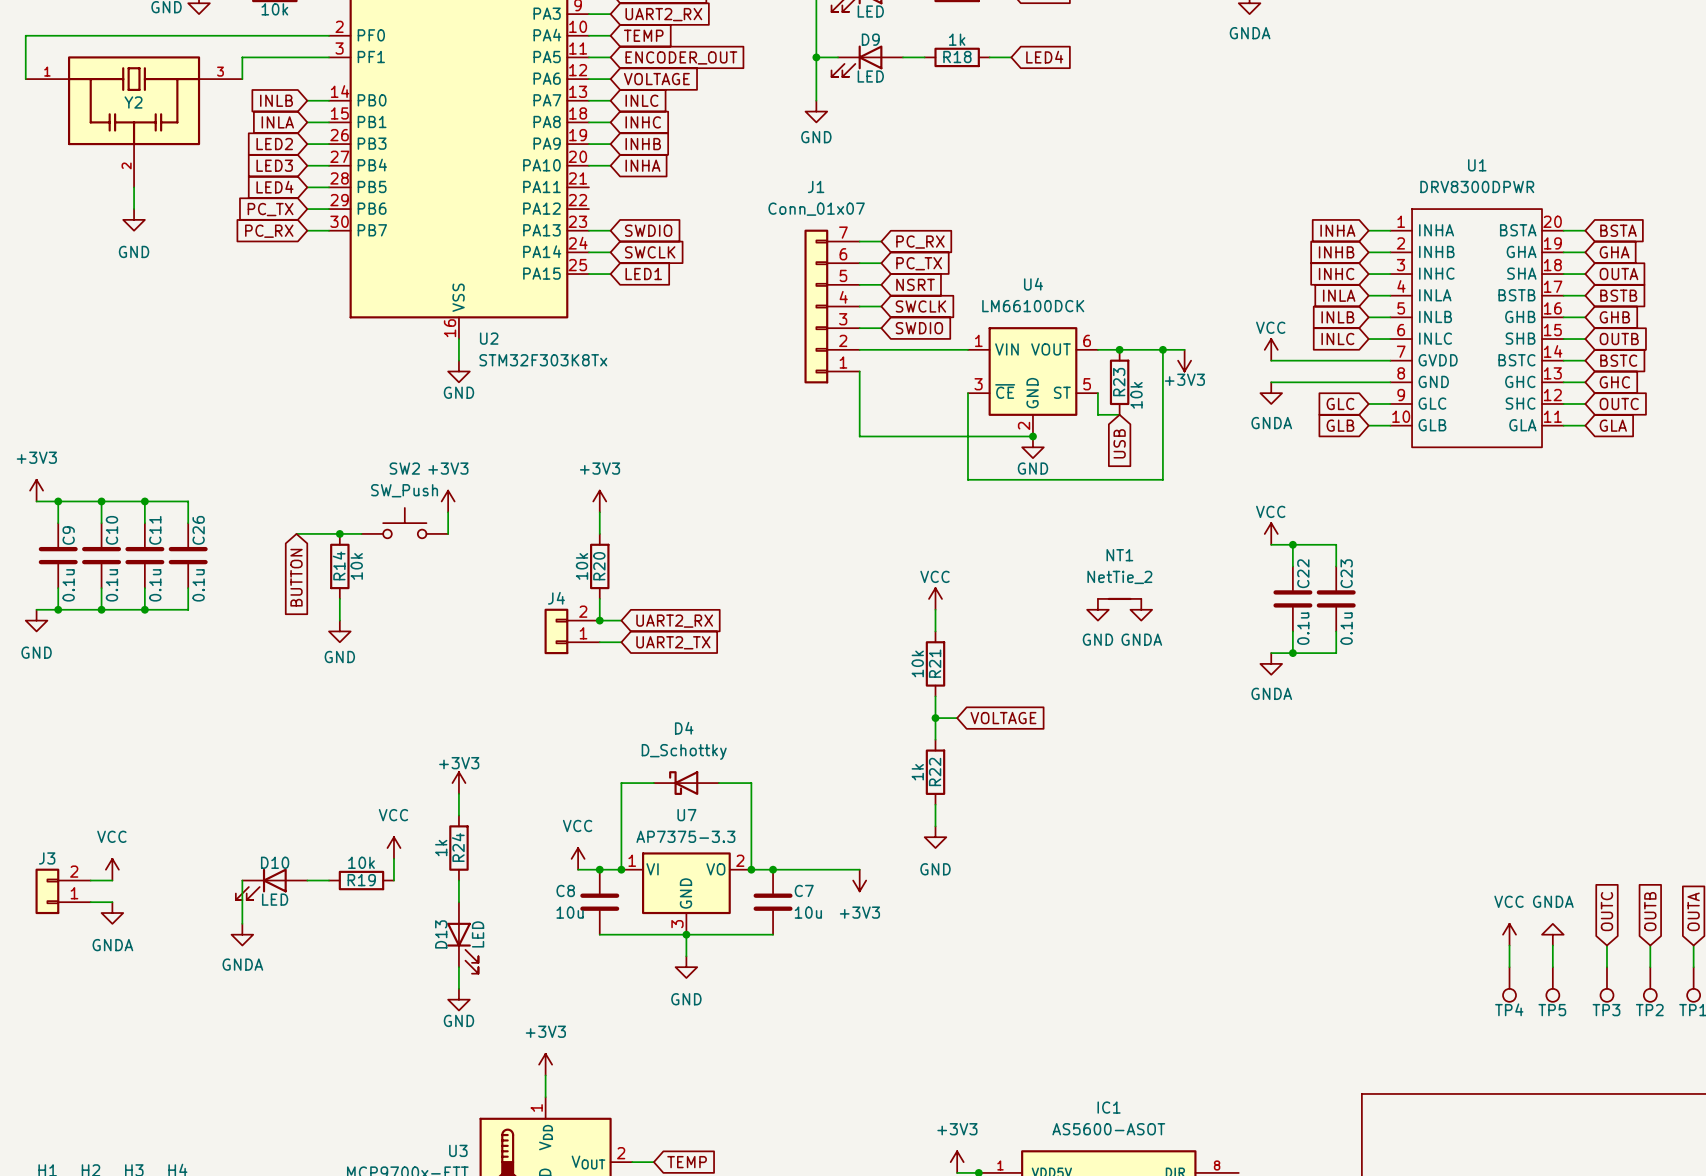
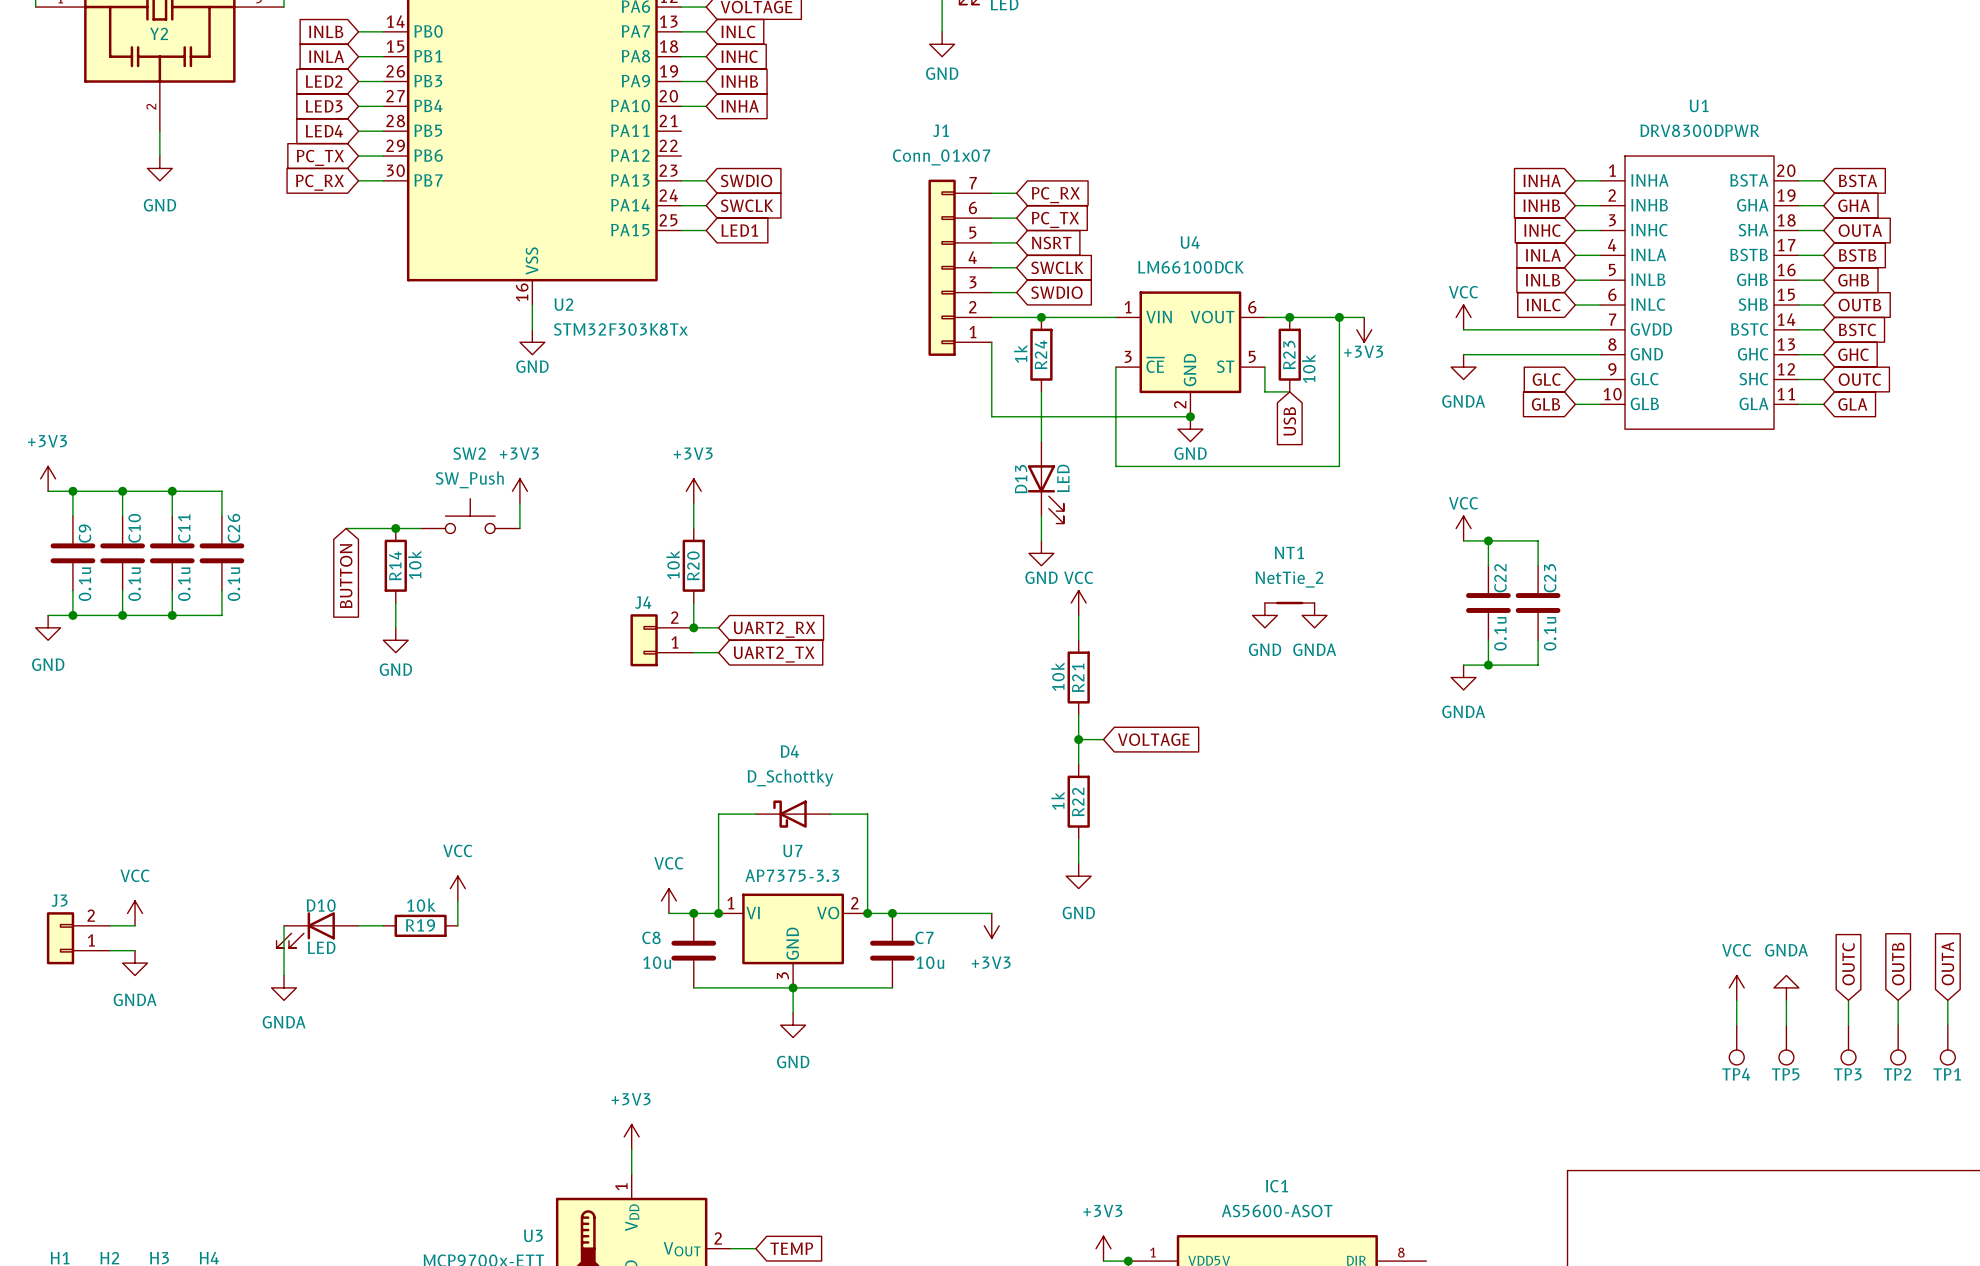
junction: none -> (1041, 317)
wire: none -> (1041, 391) (1041, 441)
wire: none -> (1041, 516) (1041, 540)
power symbol: none -> GND (1041, 553)
power symbol: +3V3 (458, 783) -> none
wire: (458, 793) (458, 815) -> none
R24 position: (458, 848) -> (1041, 354)
wire: (458, 880) (458, 902) -> none
D13 position: (462, 937) -> (1045, 482)
wire: (458, 967) (458, 988) -> none
power symbol: GND (458, 999) -> none

